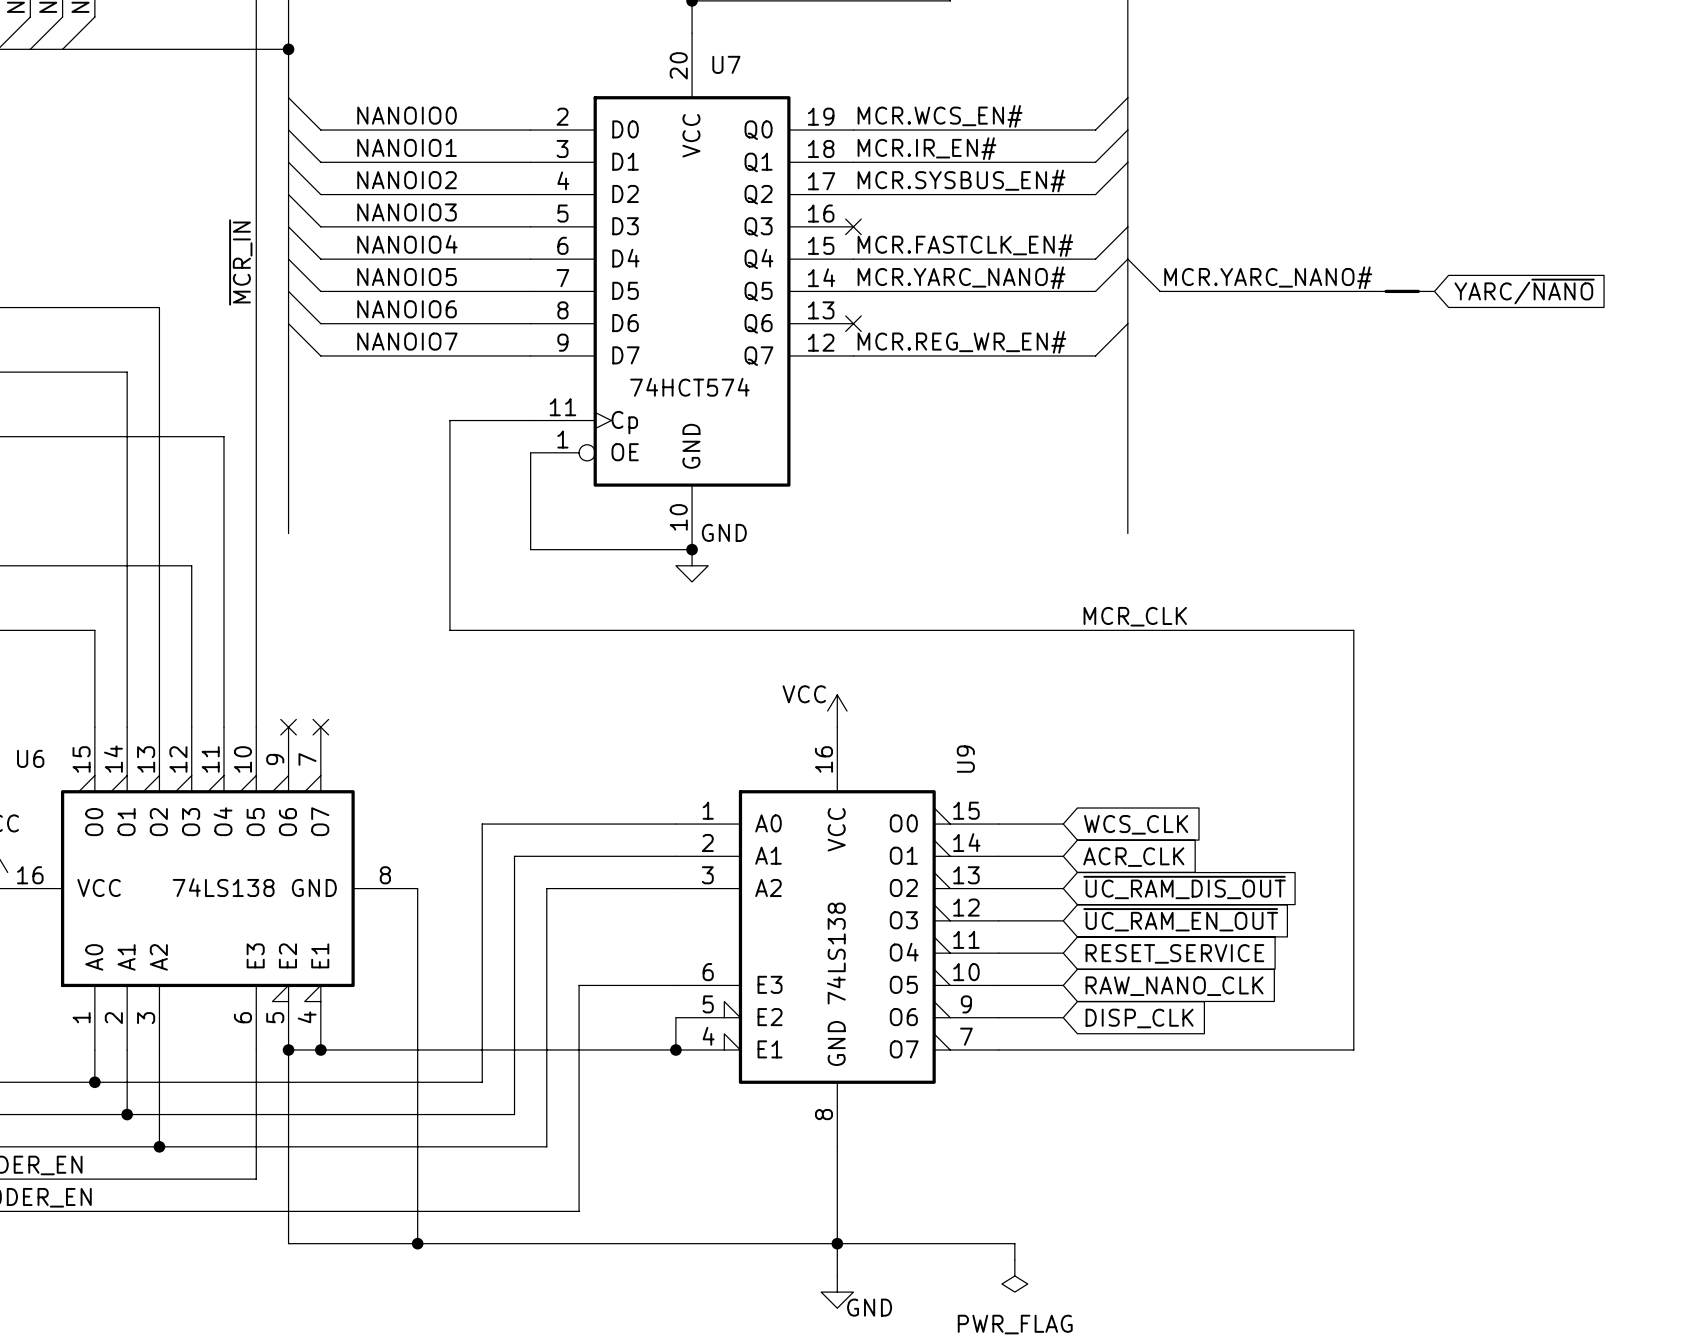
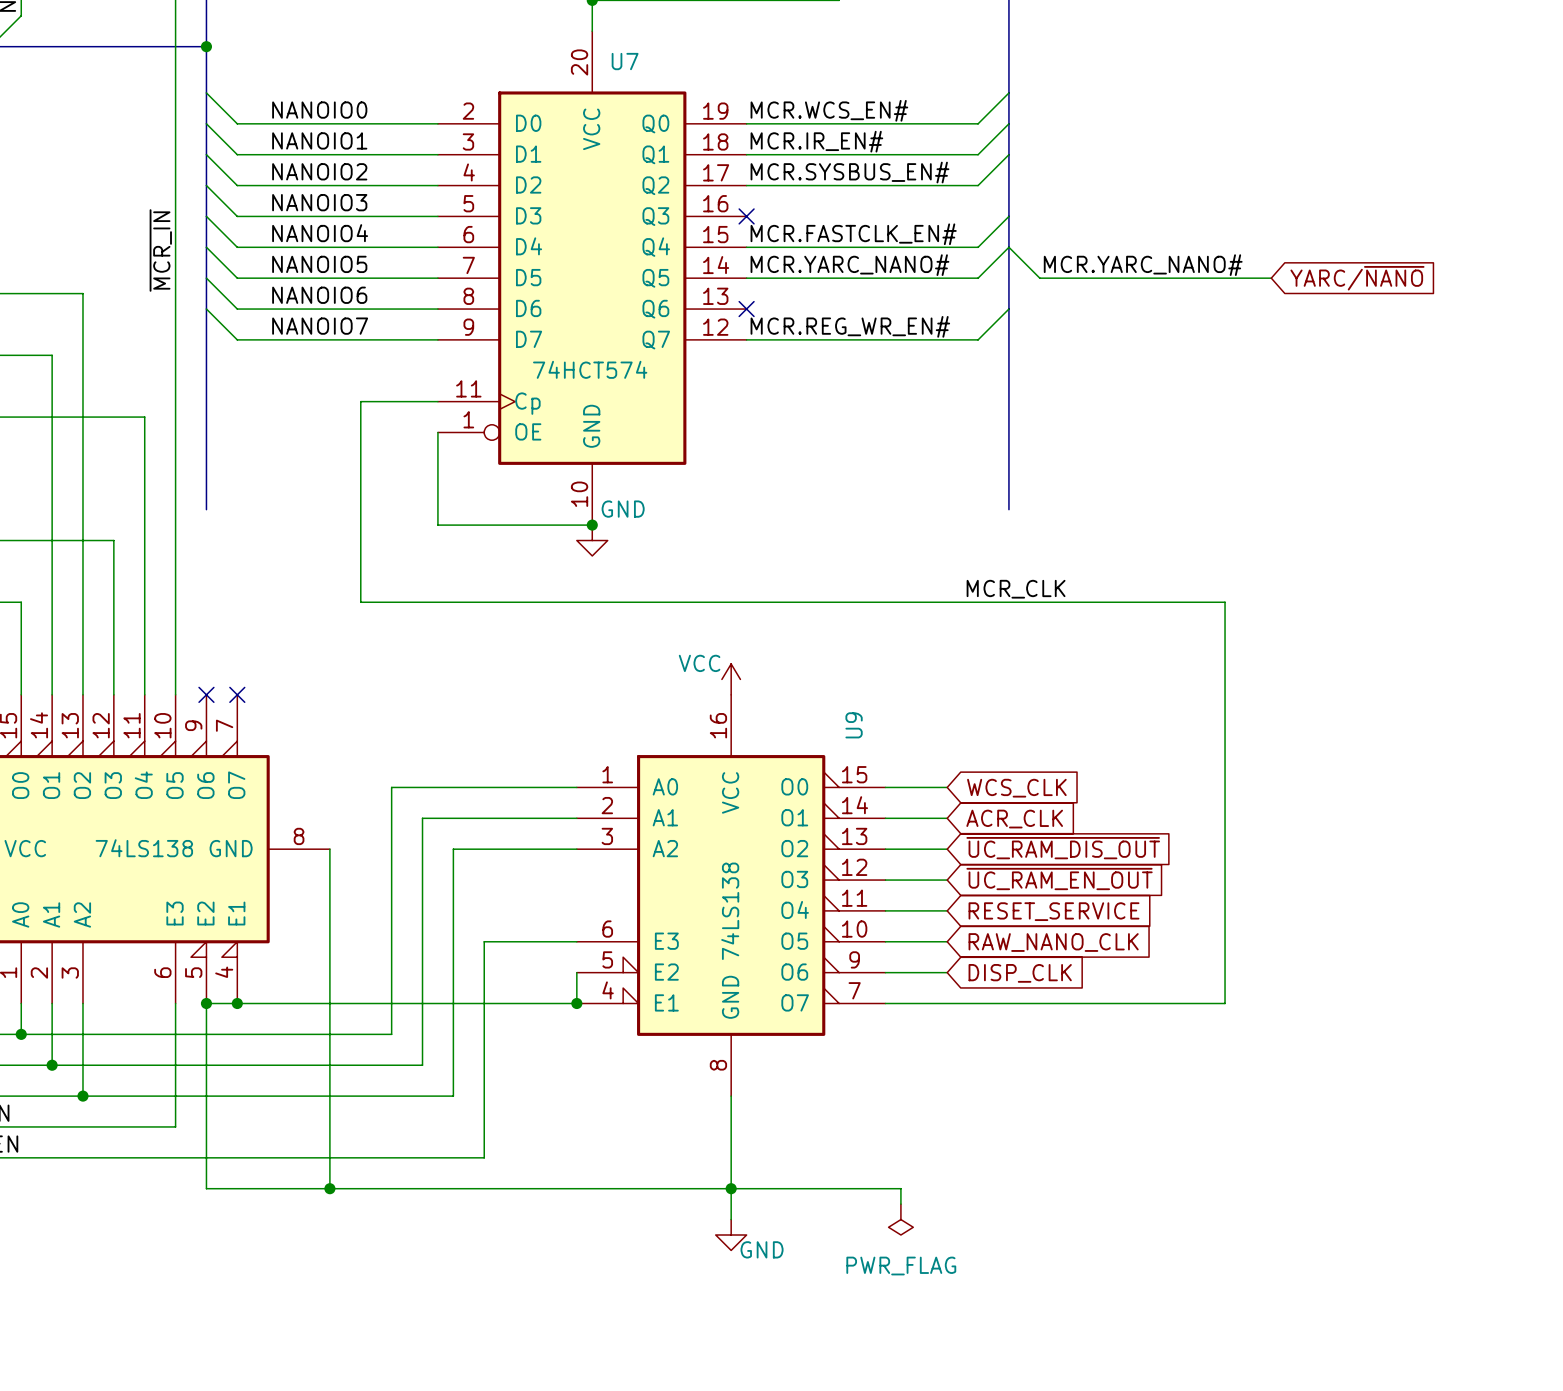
part: (1402, 291) -> none
global label position: YARC/~{NANO} (1524, 291) -> YARC/~{NANO} (1357, 278)

